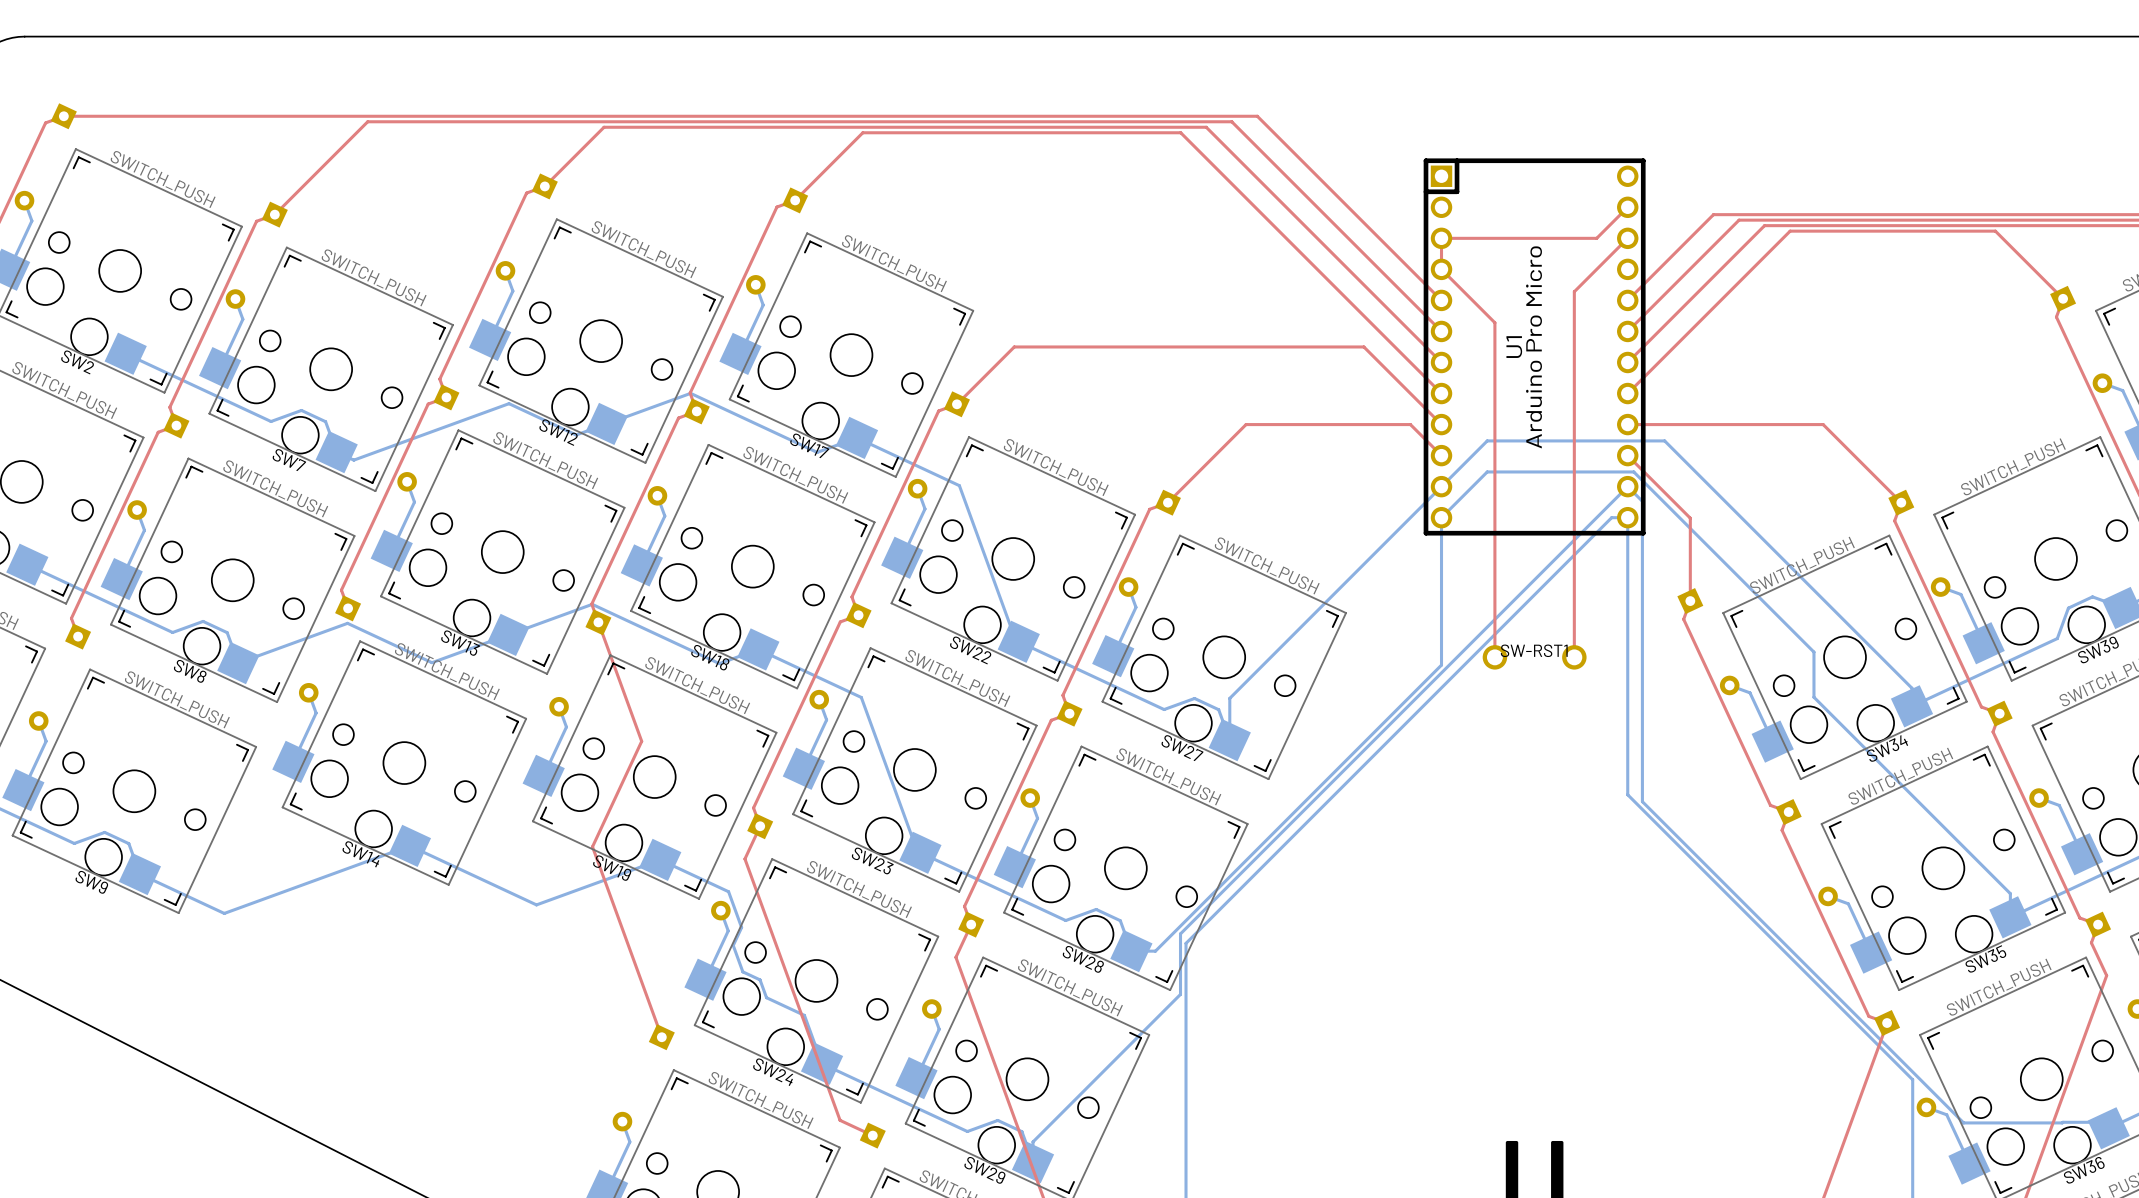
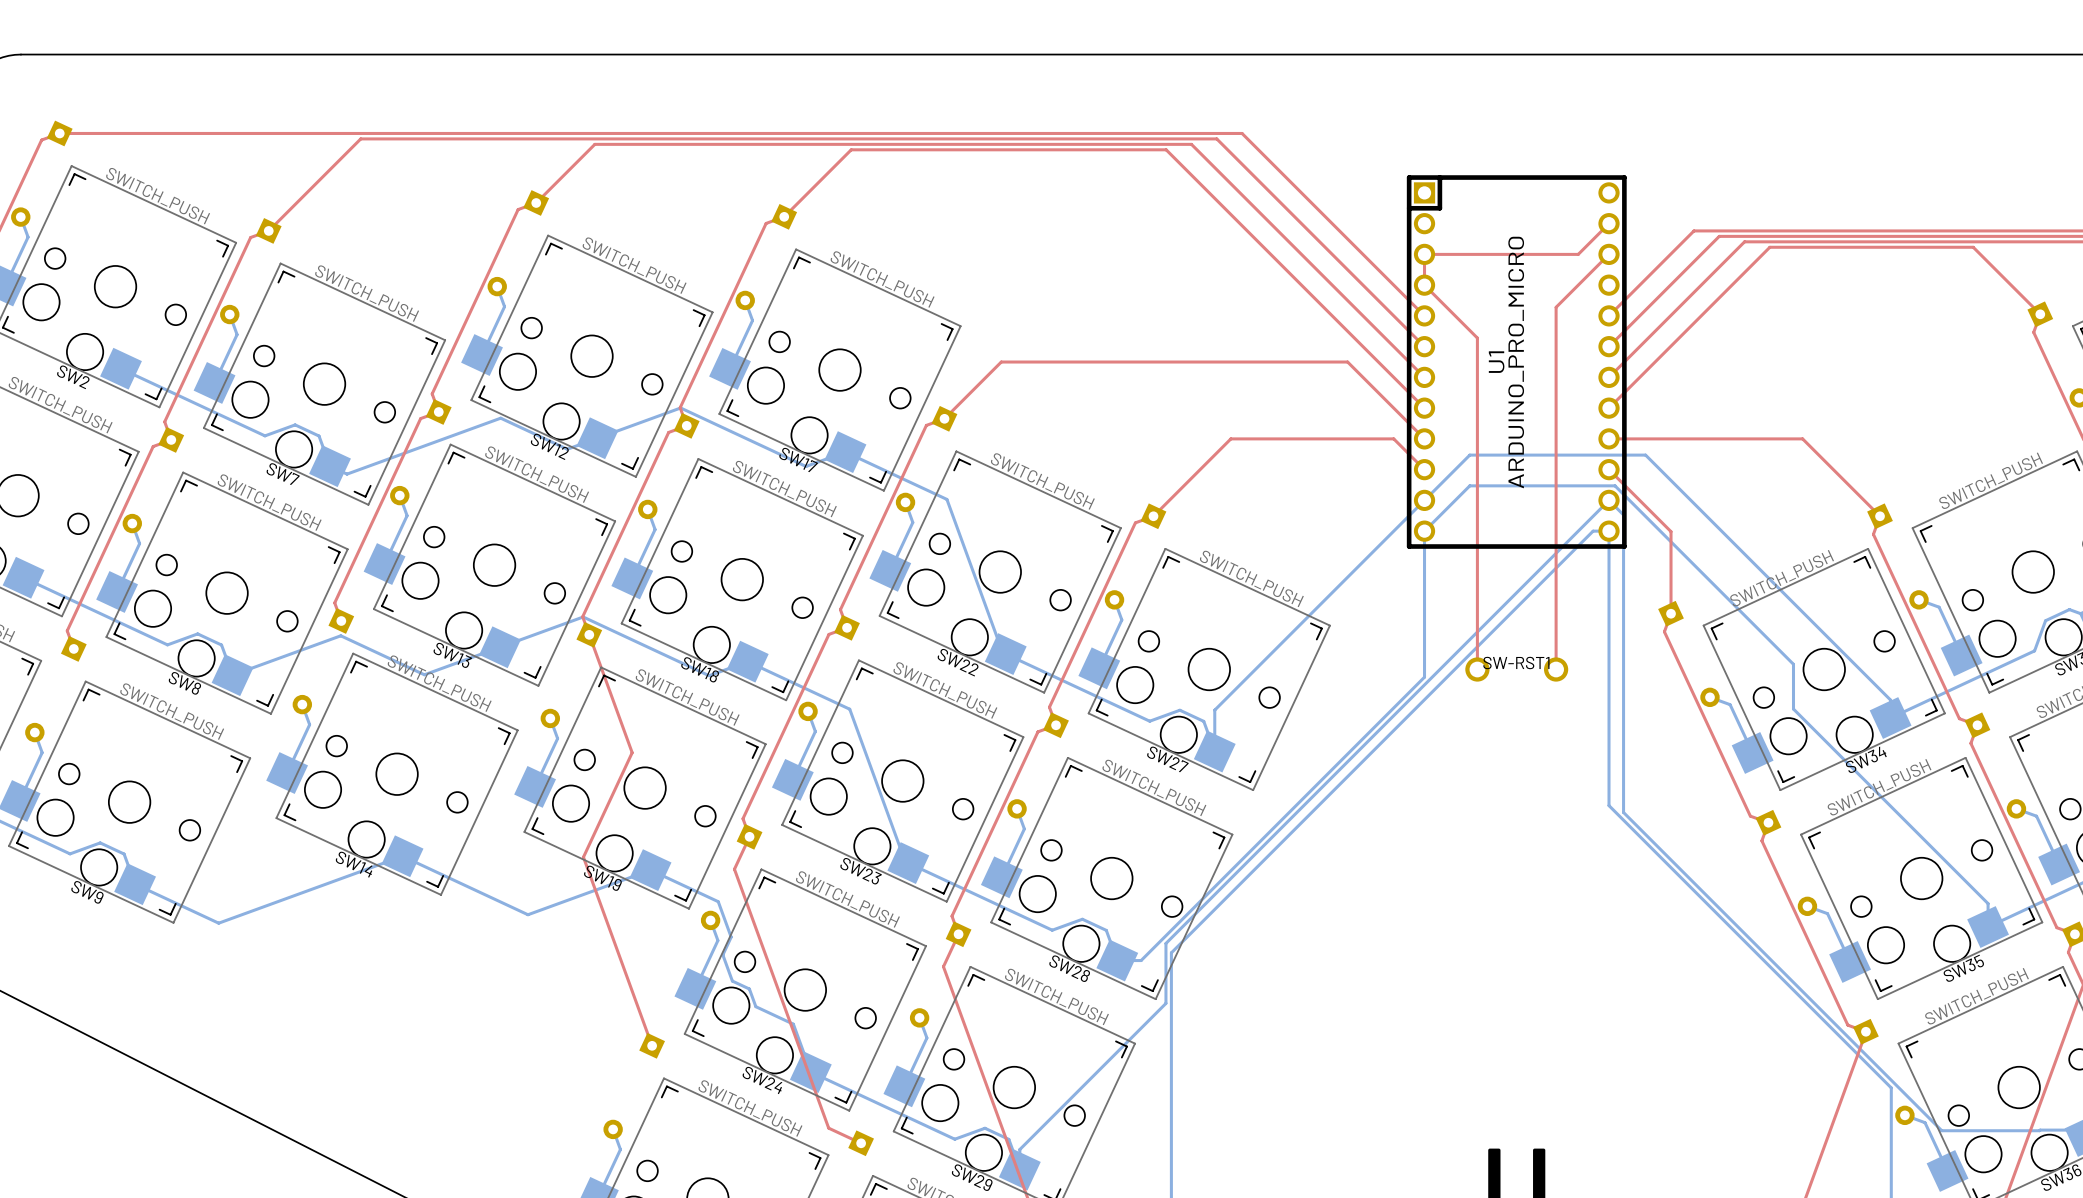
U1 value: Arduino Pro Micro (1534, 347) -> ARDUINO_PRO_MICRO (1516, 362)

